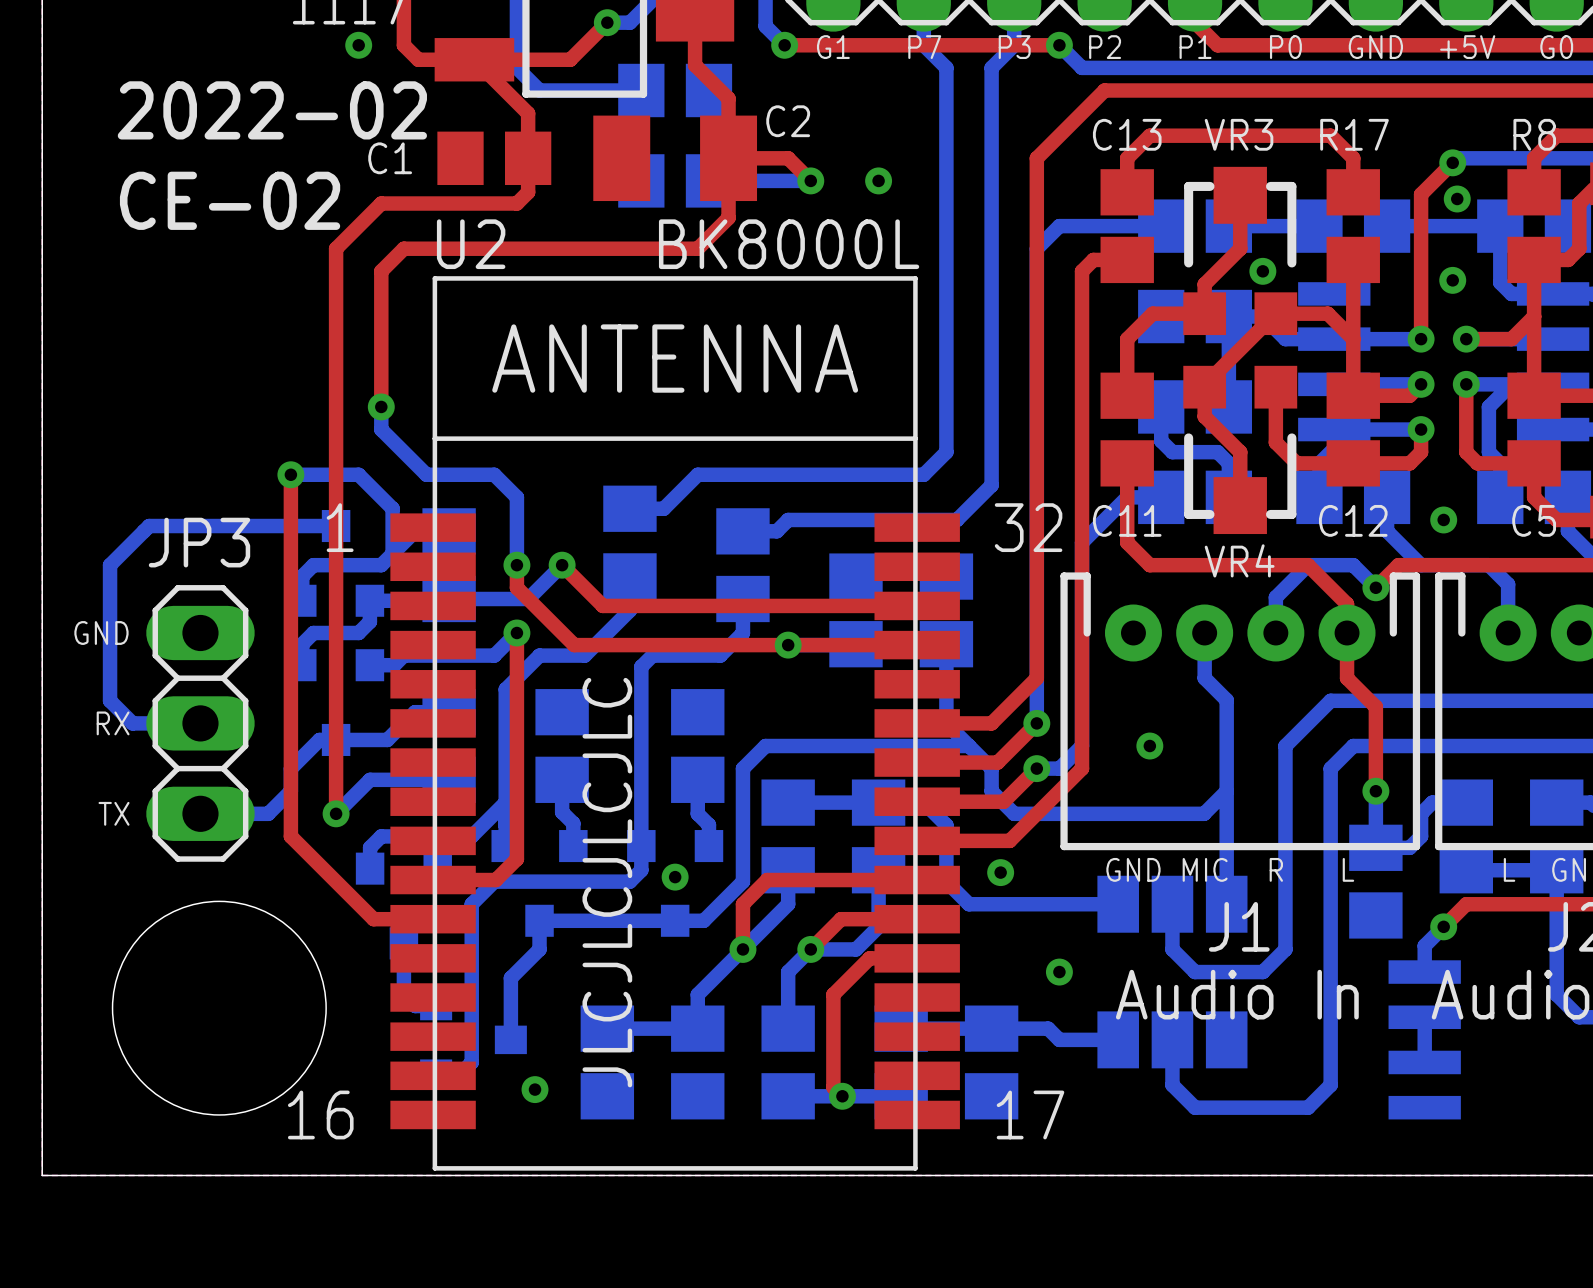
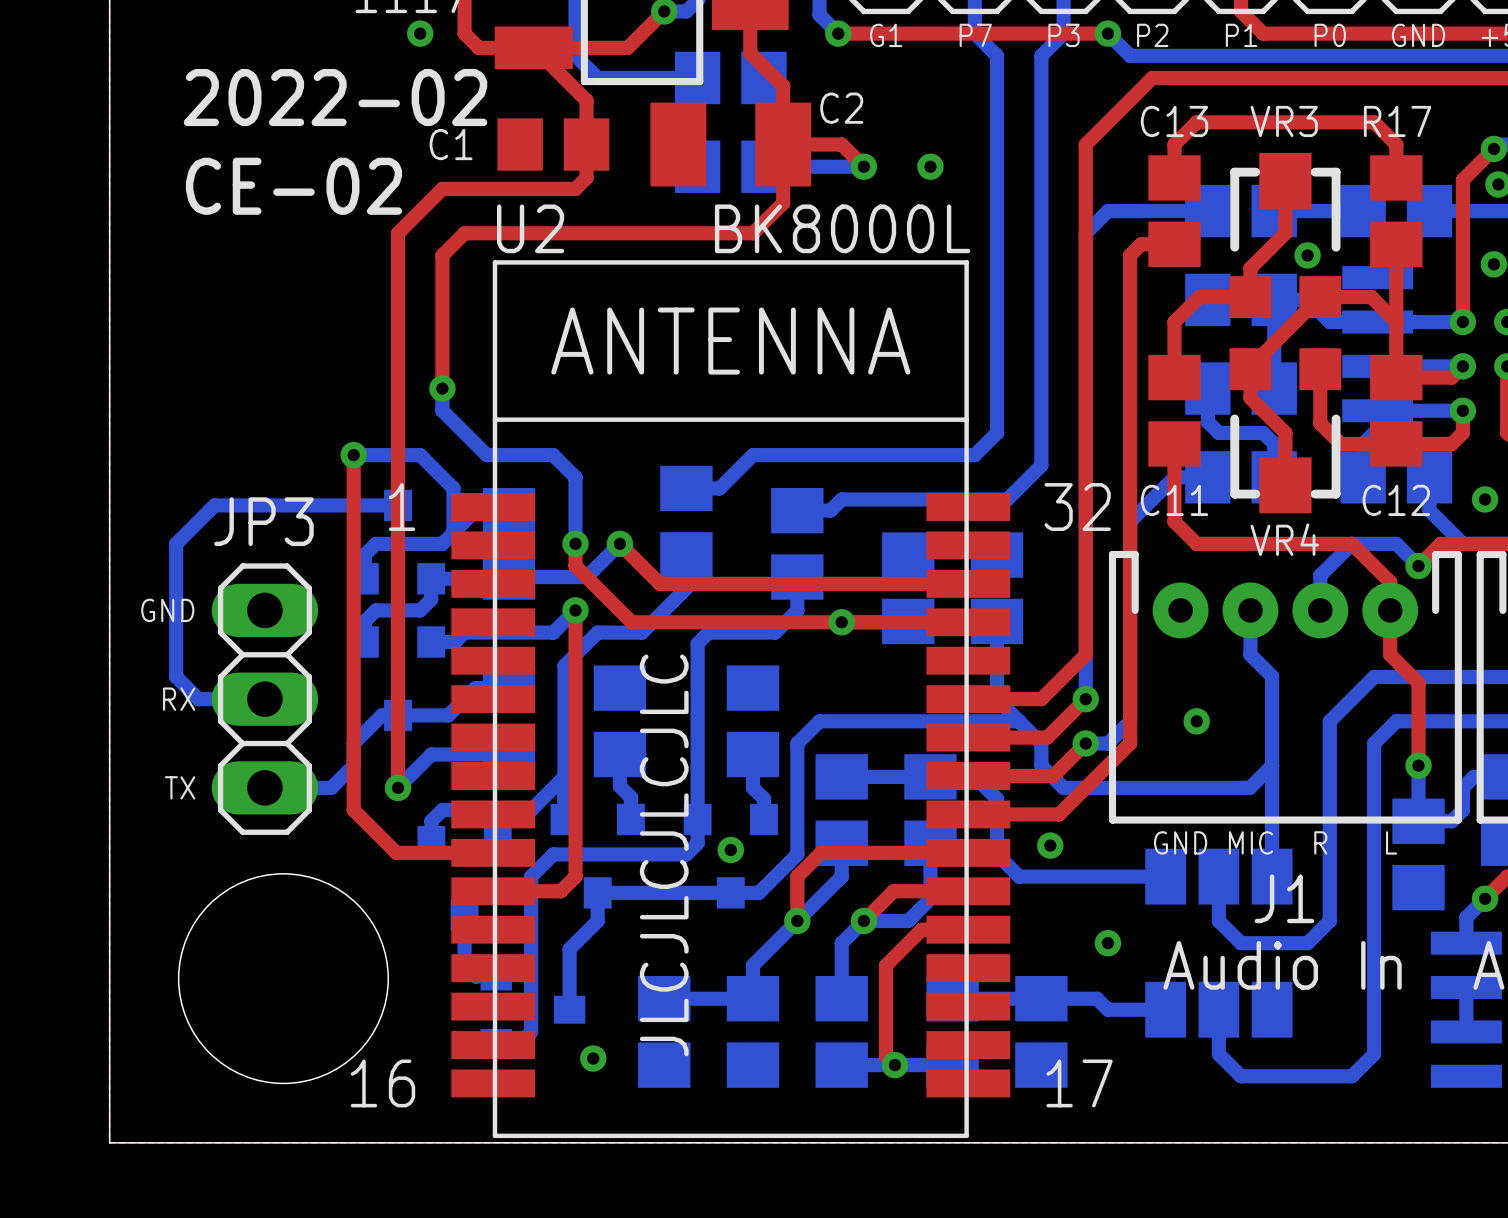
top track: (516, 859) (495, 880) (433, 880) -> (575, 832) (575, 876) (560, 891) (493, 891)
top track: (334, 880) (373, 919) (433, 919) -> (396, 852) (493, 852)

